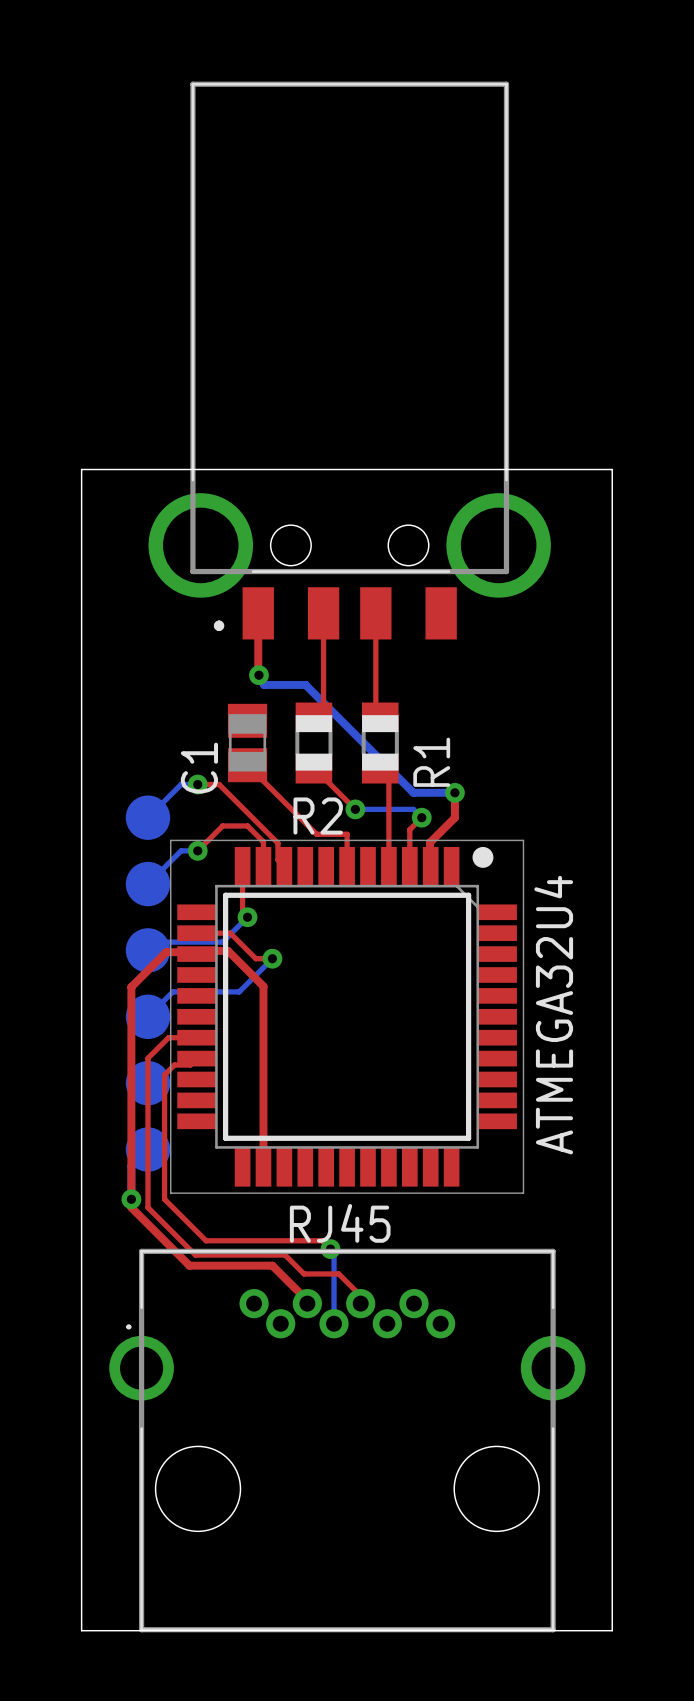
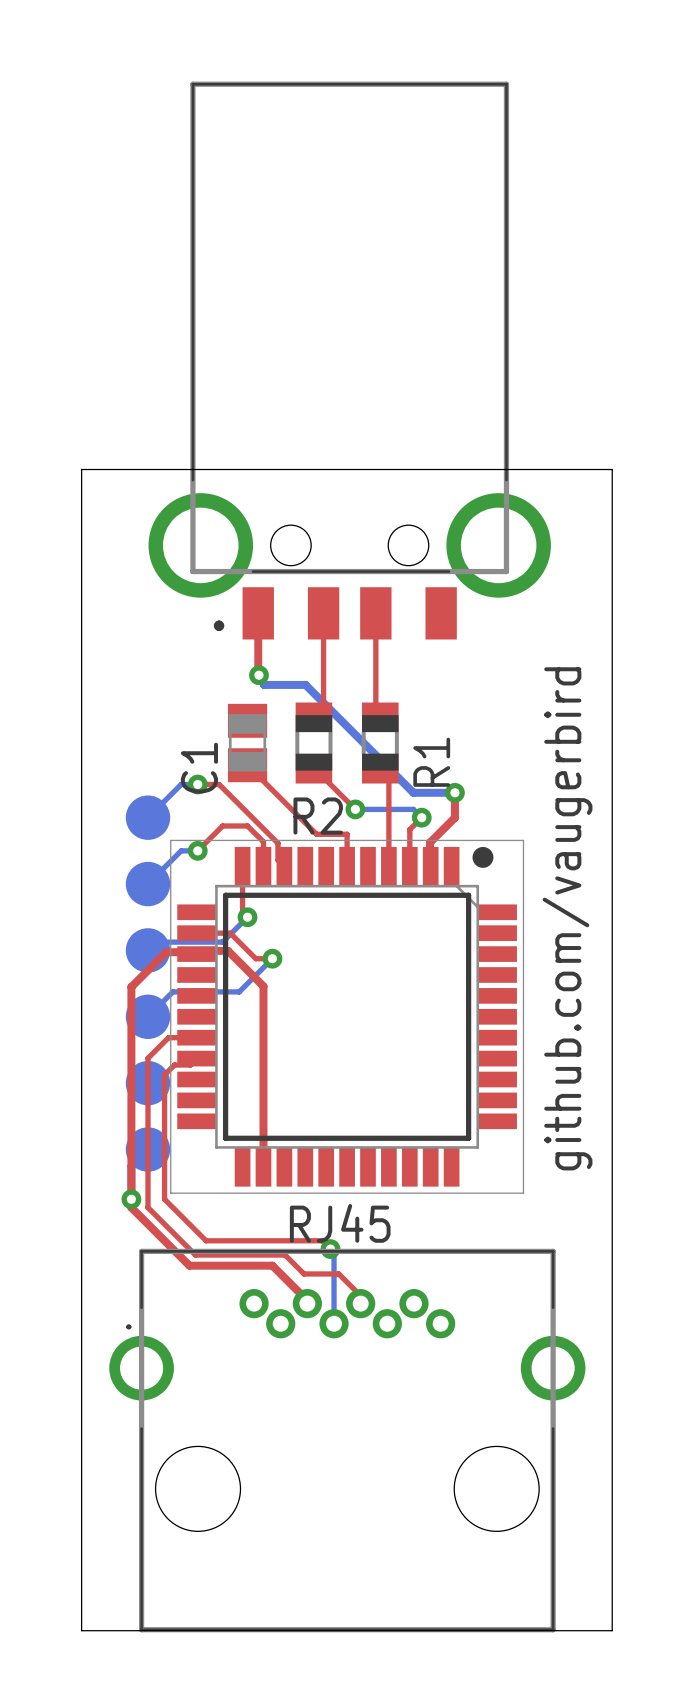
text: none -> github.com/vaugerbird (567, 918)
text: ATMEGA32U4 (553, 1015) -> none

